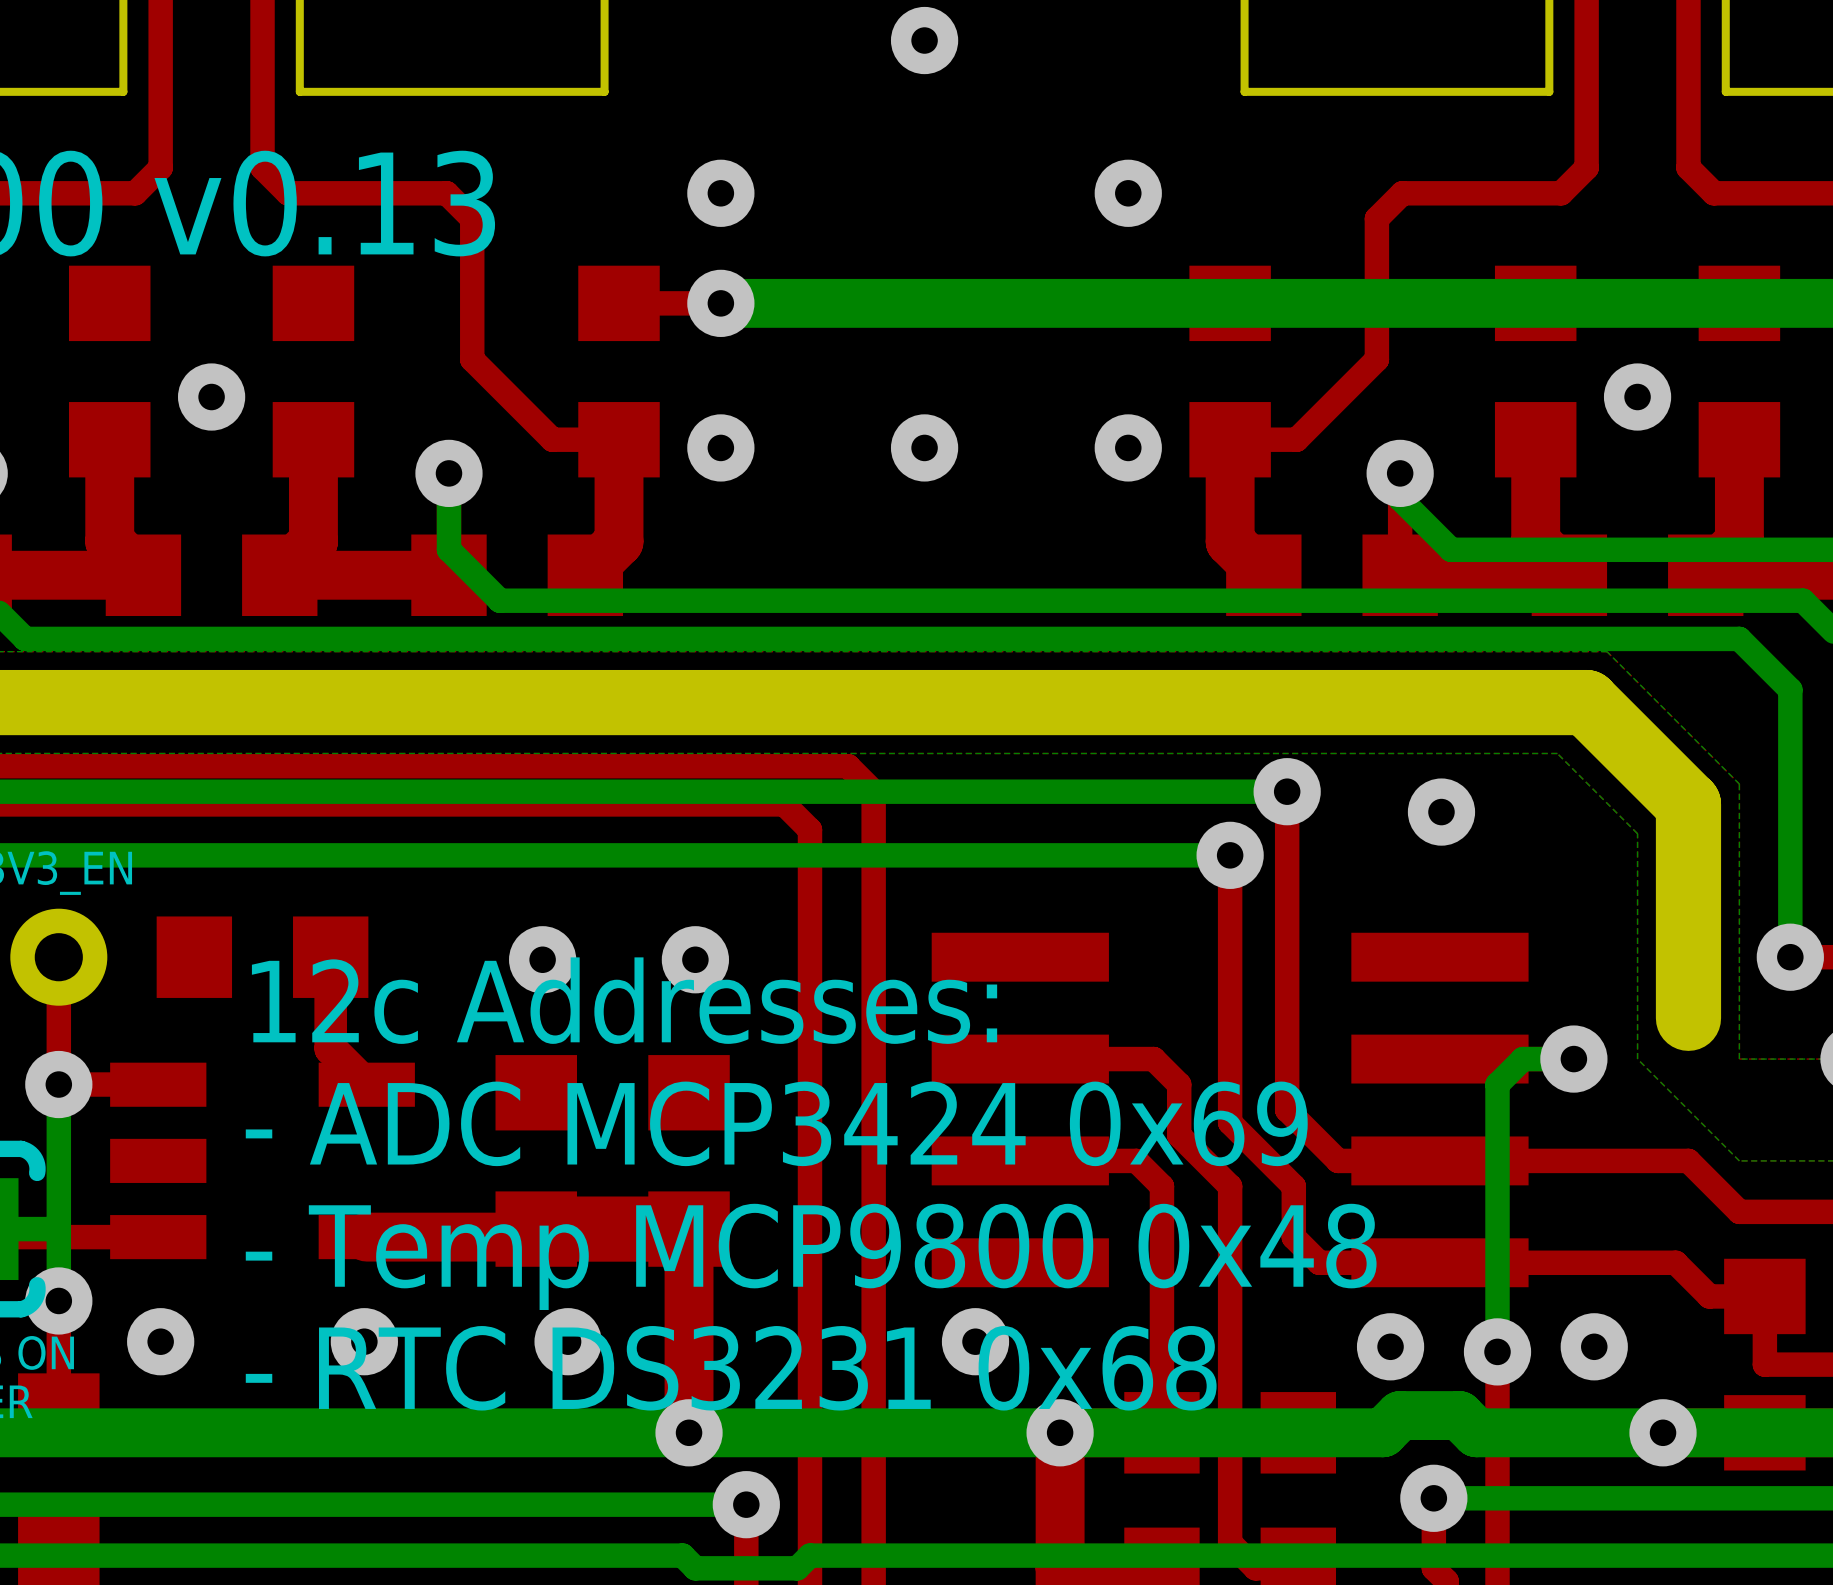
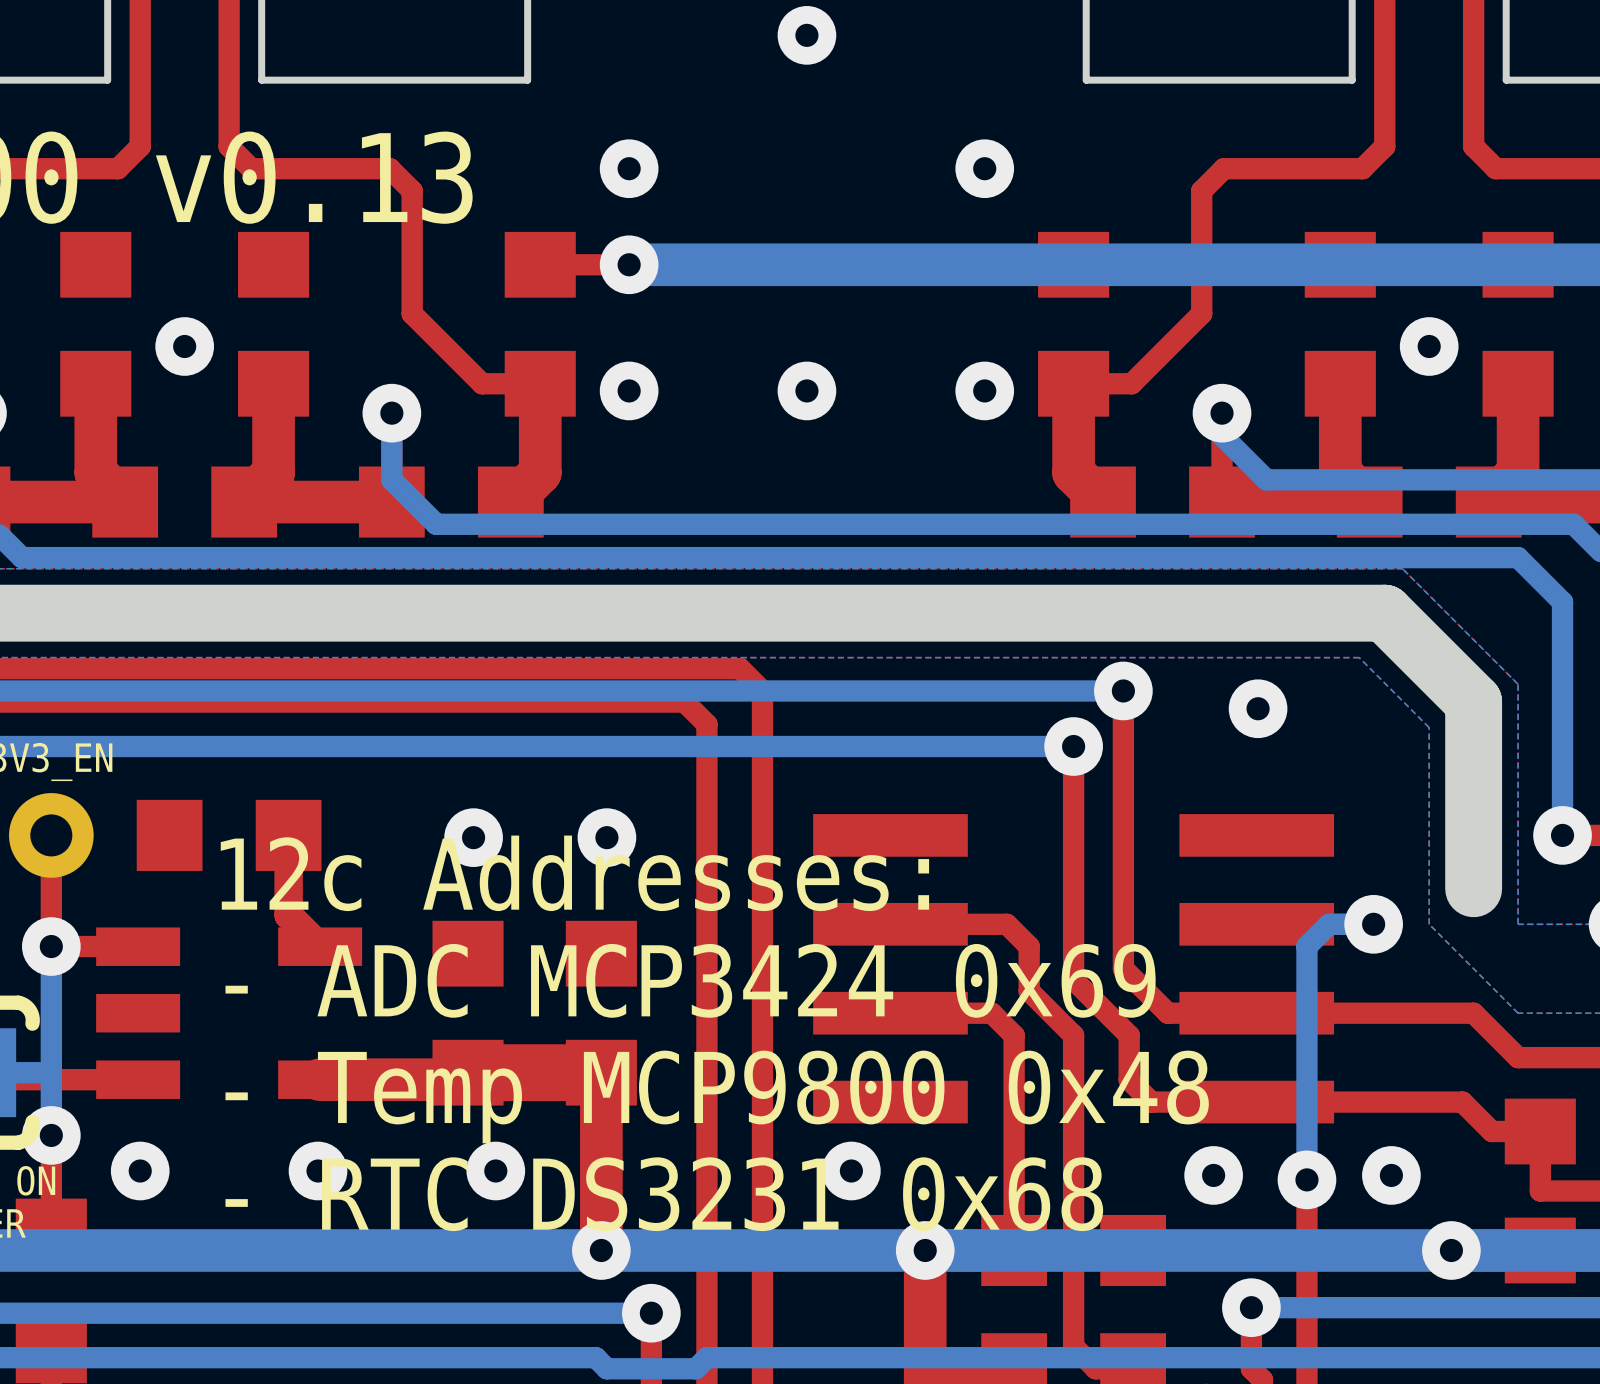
bottom track: (1476, 1432) (1459, 1415) (1400, 1415) (1382, 1432) -> (1288, 1250) (1206, 1250)

